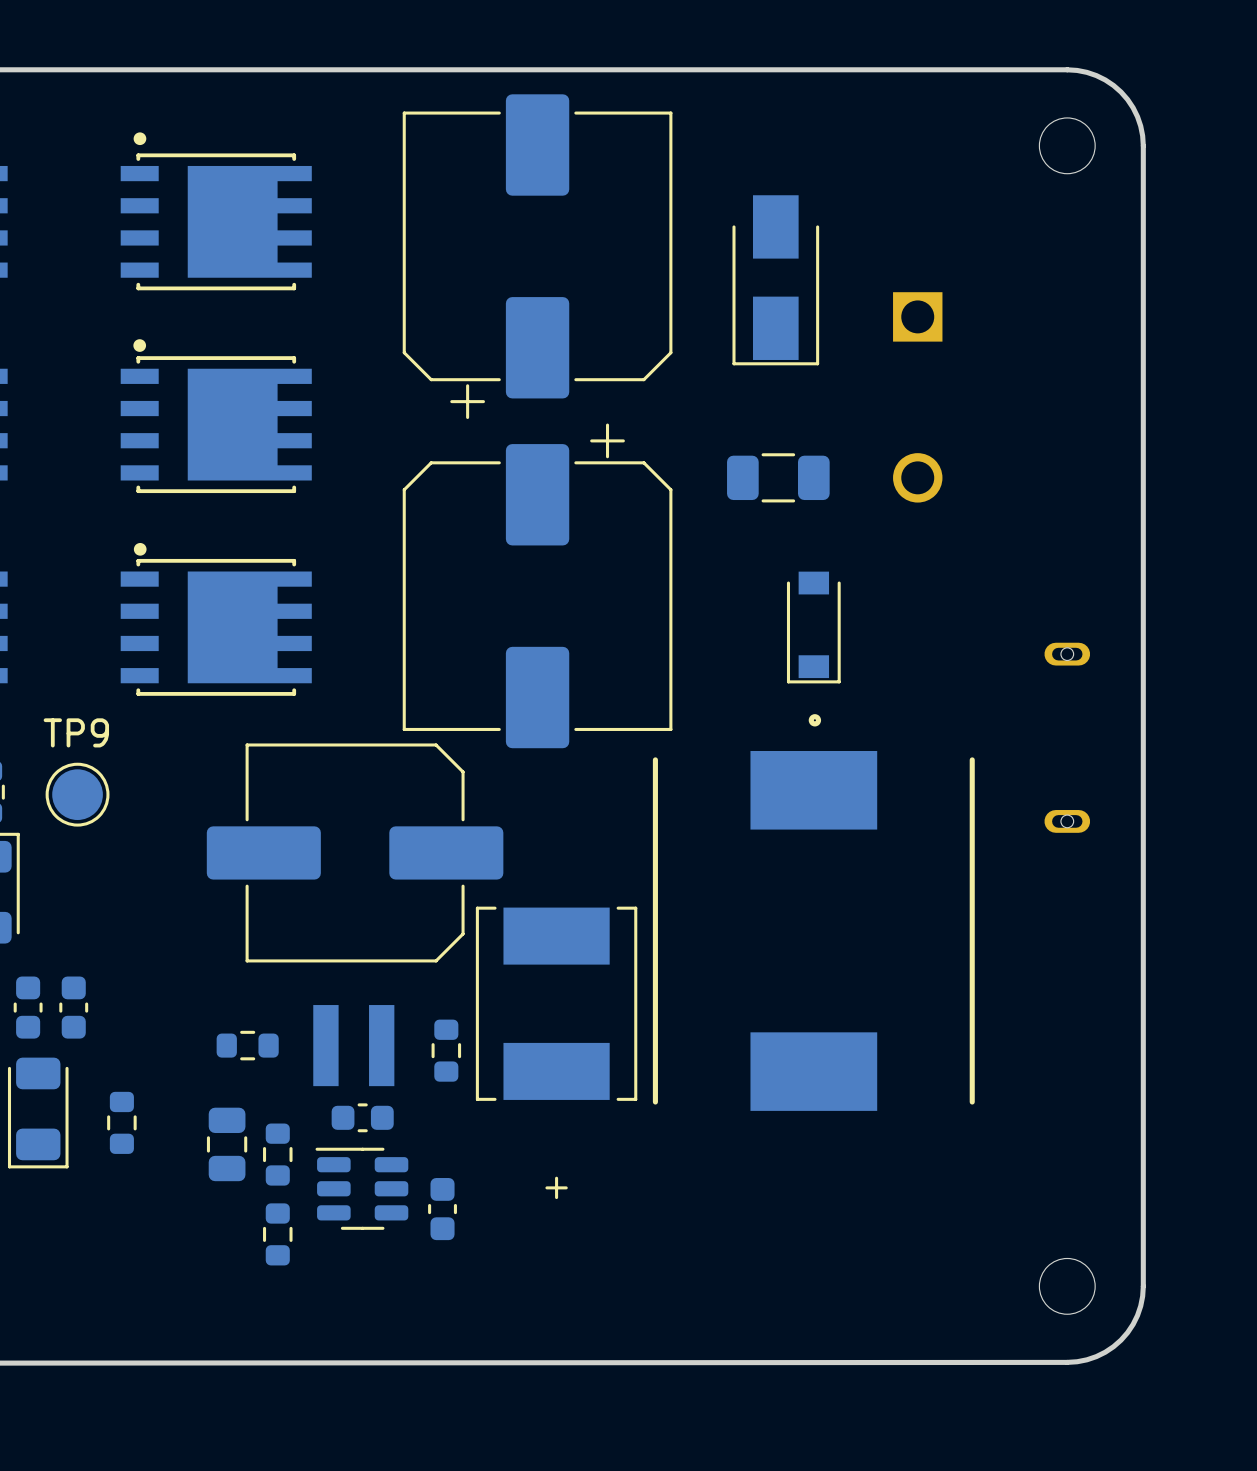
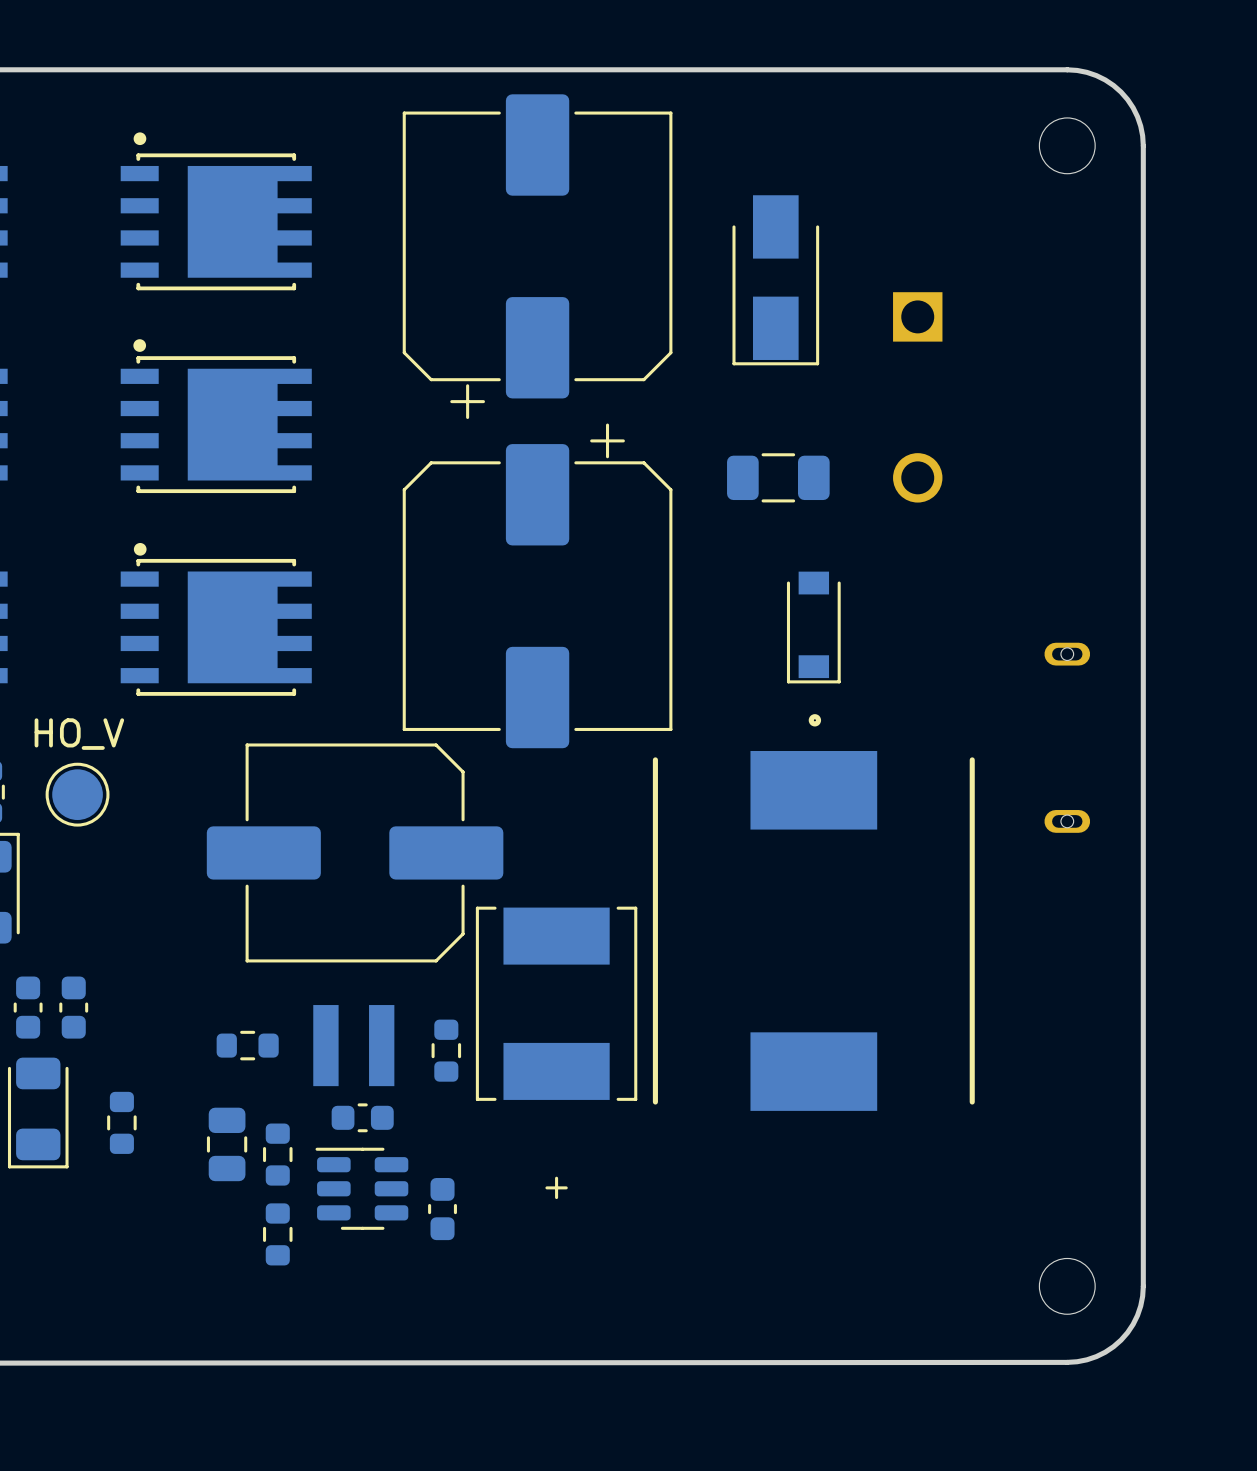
TP9 name: TP9 (76, 732) -> HO_V (79, 734)

